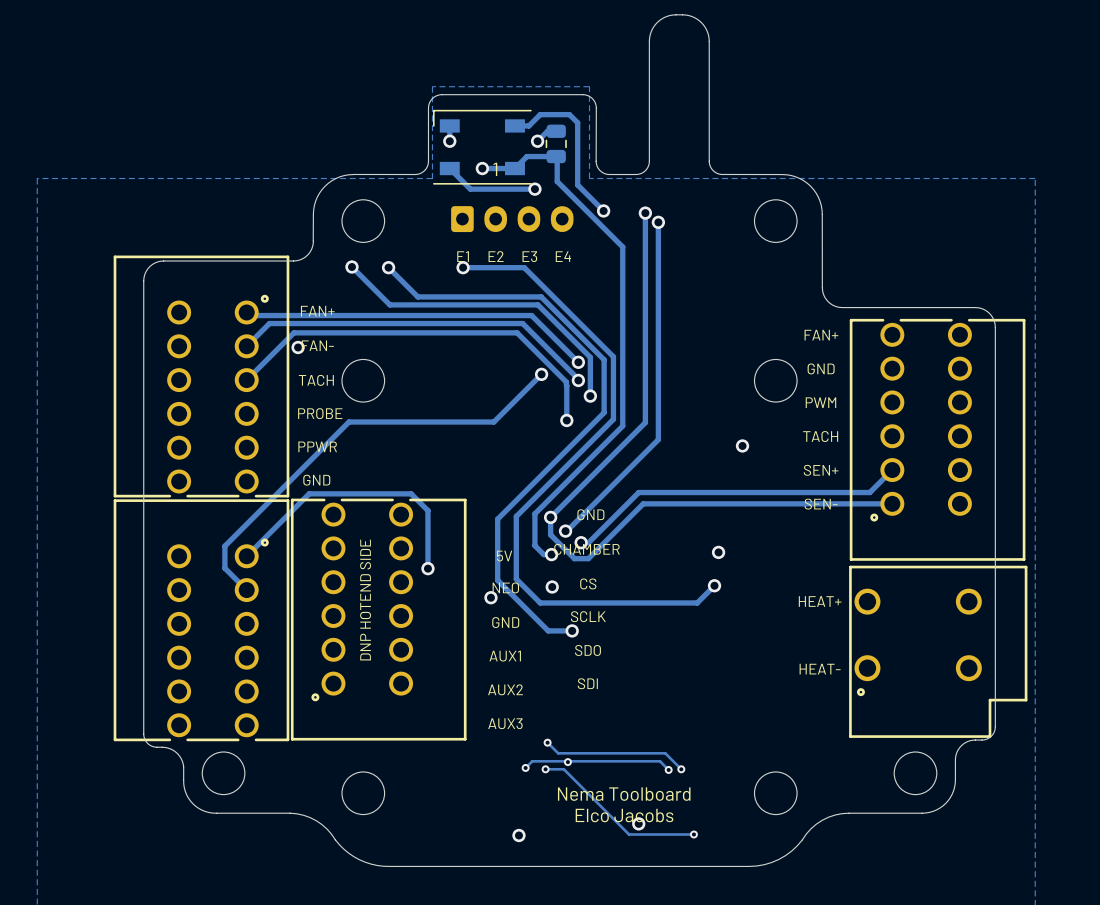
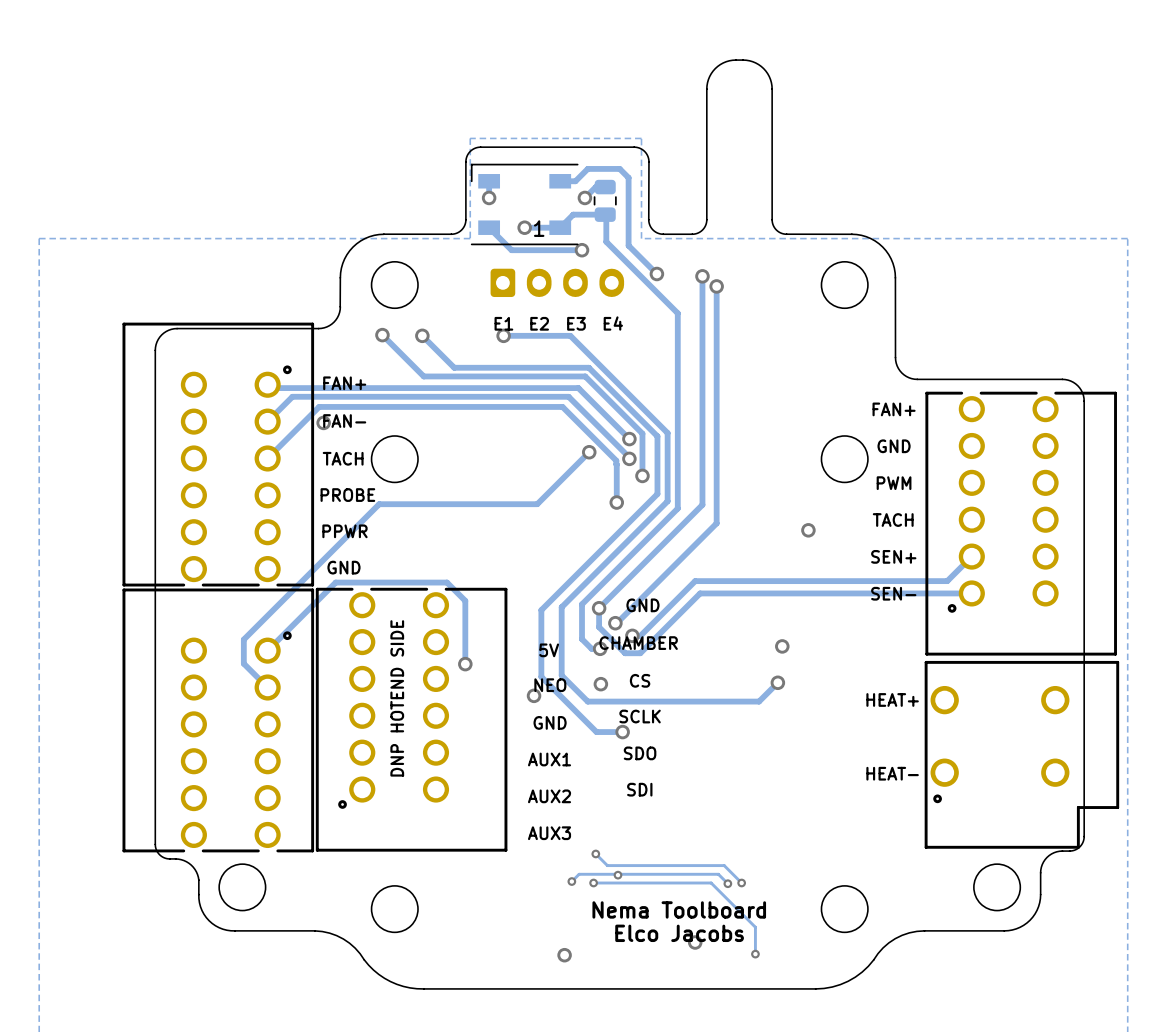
track: (563, 769) (629, 834) (693, 834) -> (613, 883) (711, 883) (755, 927) (755, 954)

